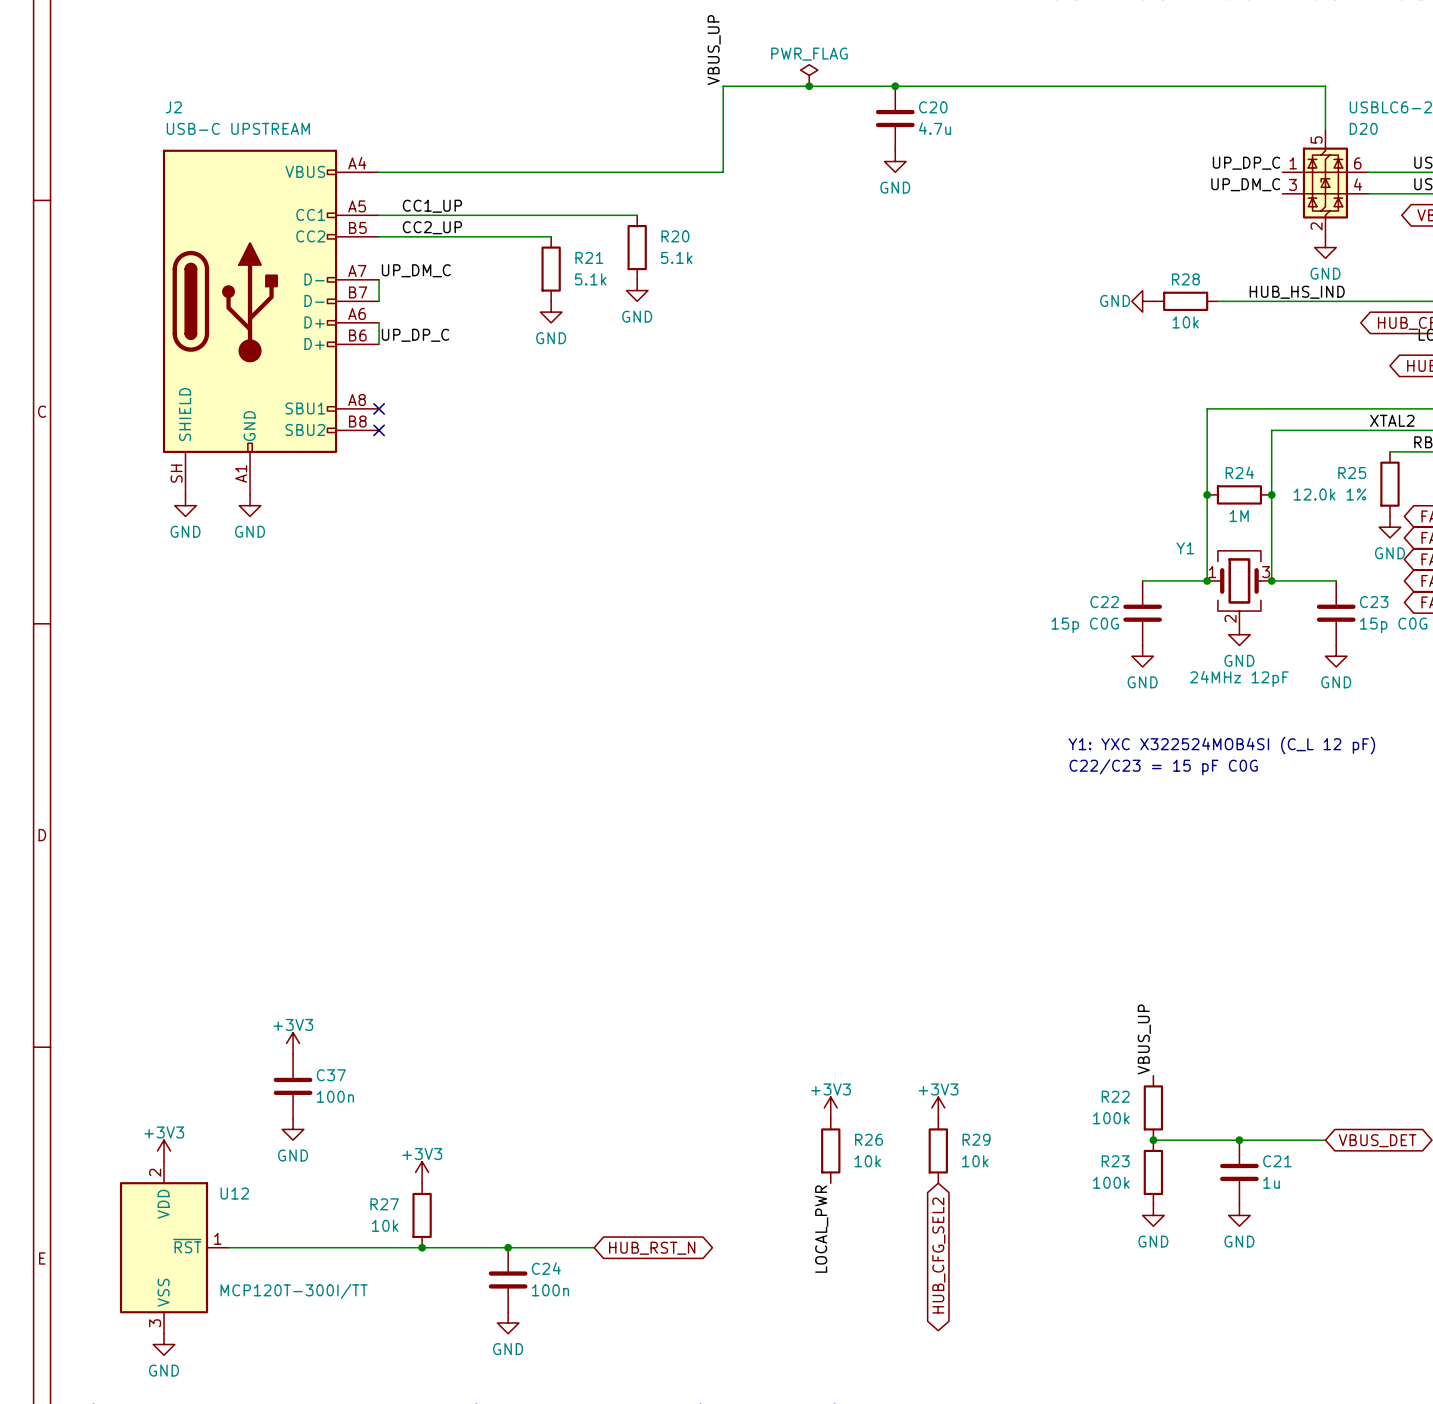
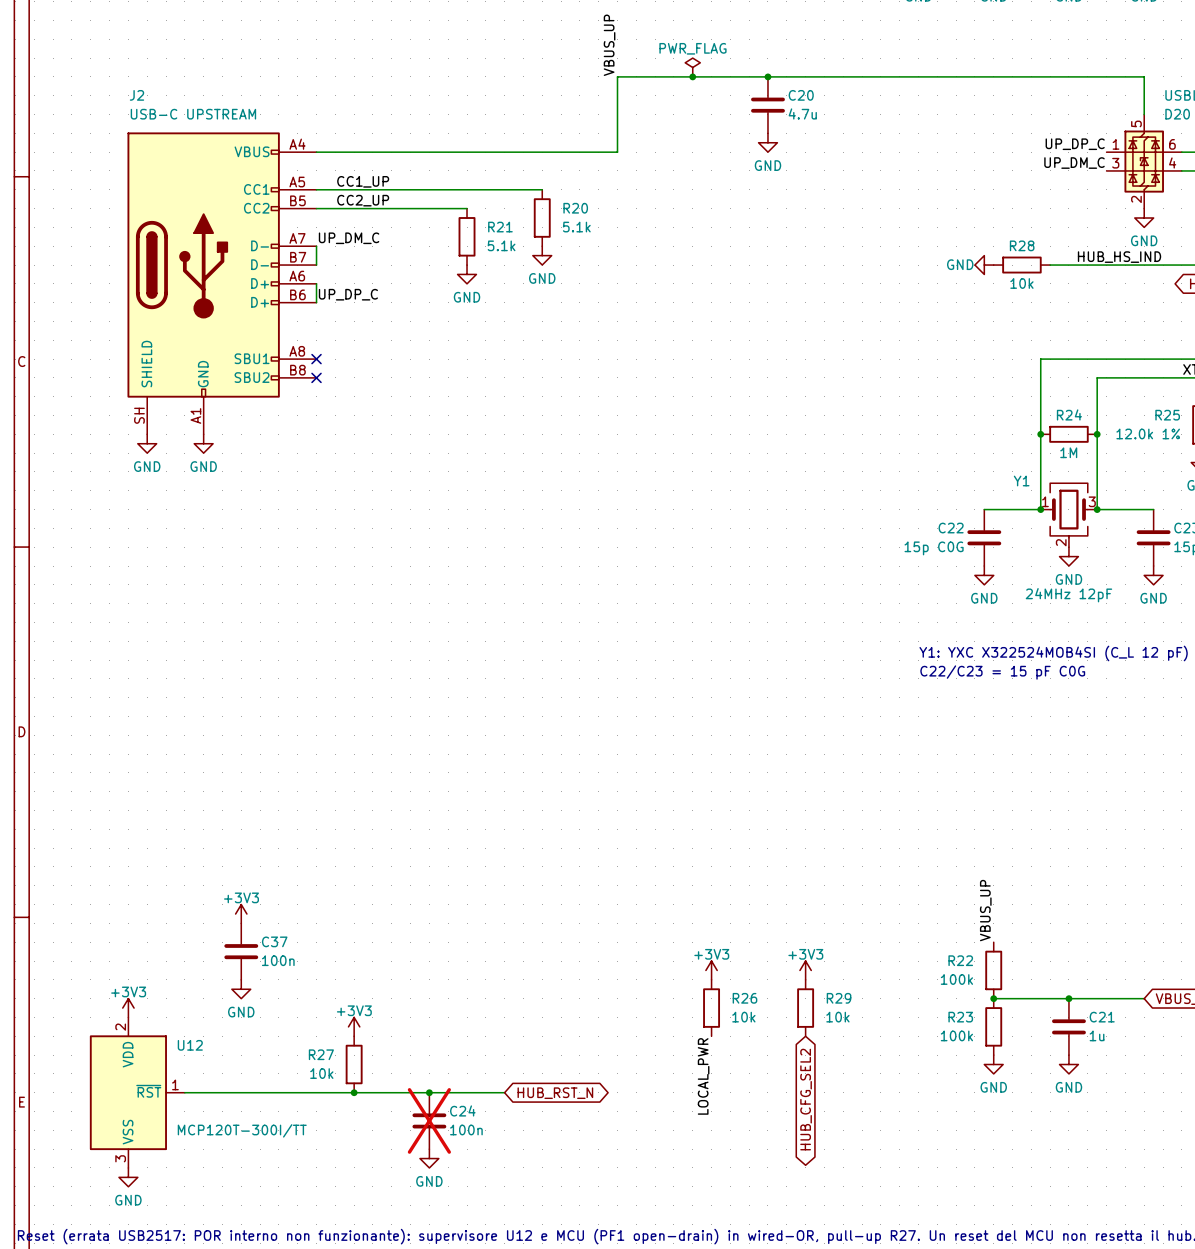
C24 do-not-place cross: none -> (429, 1120)

